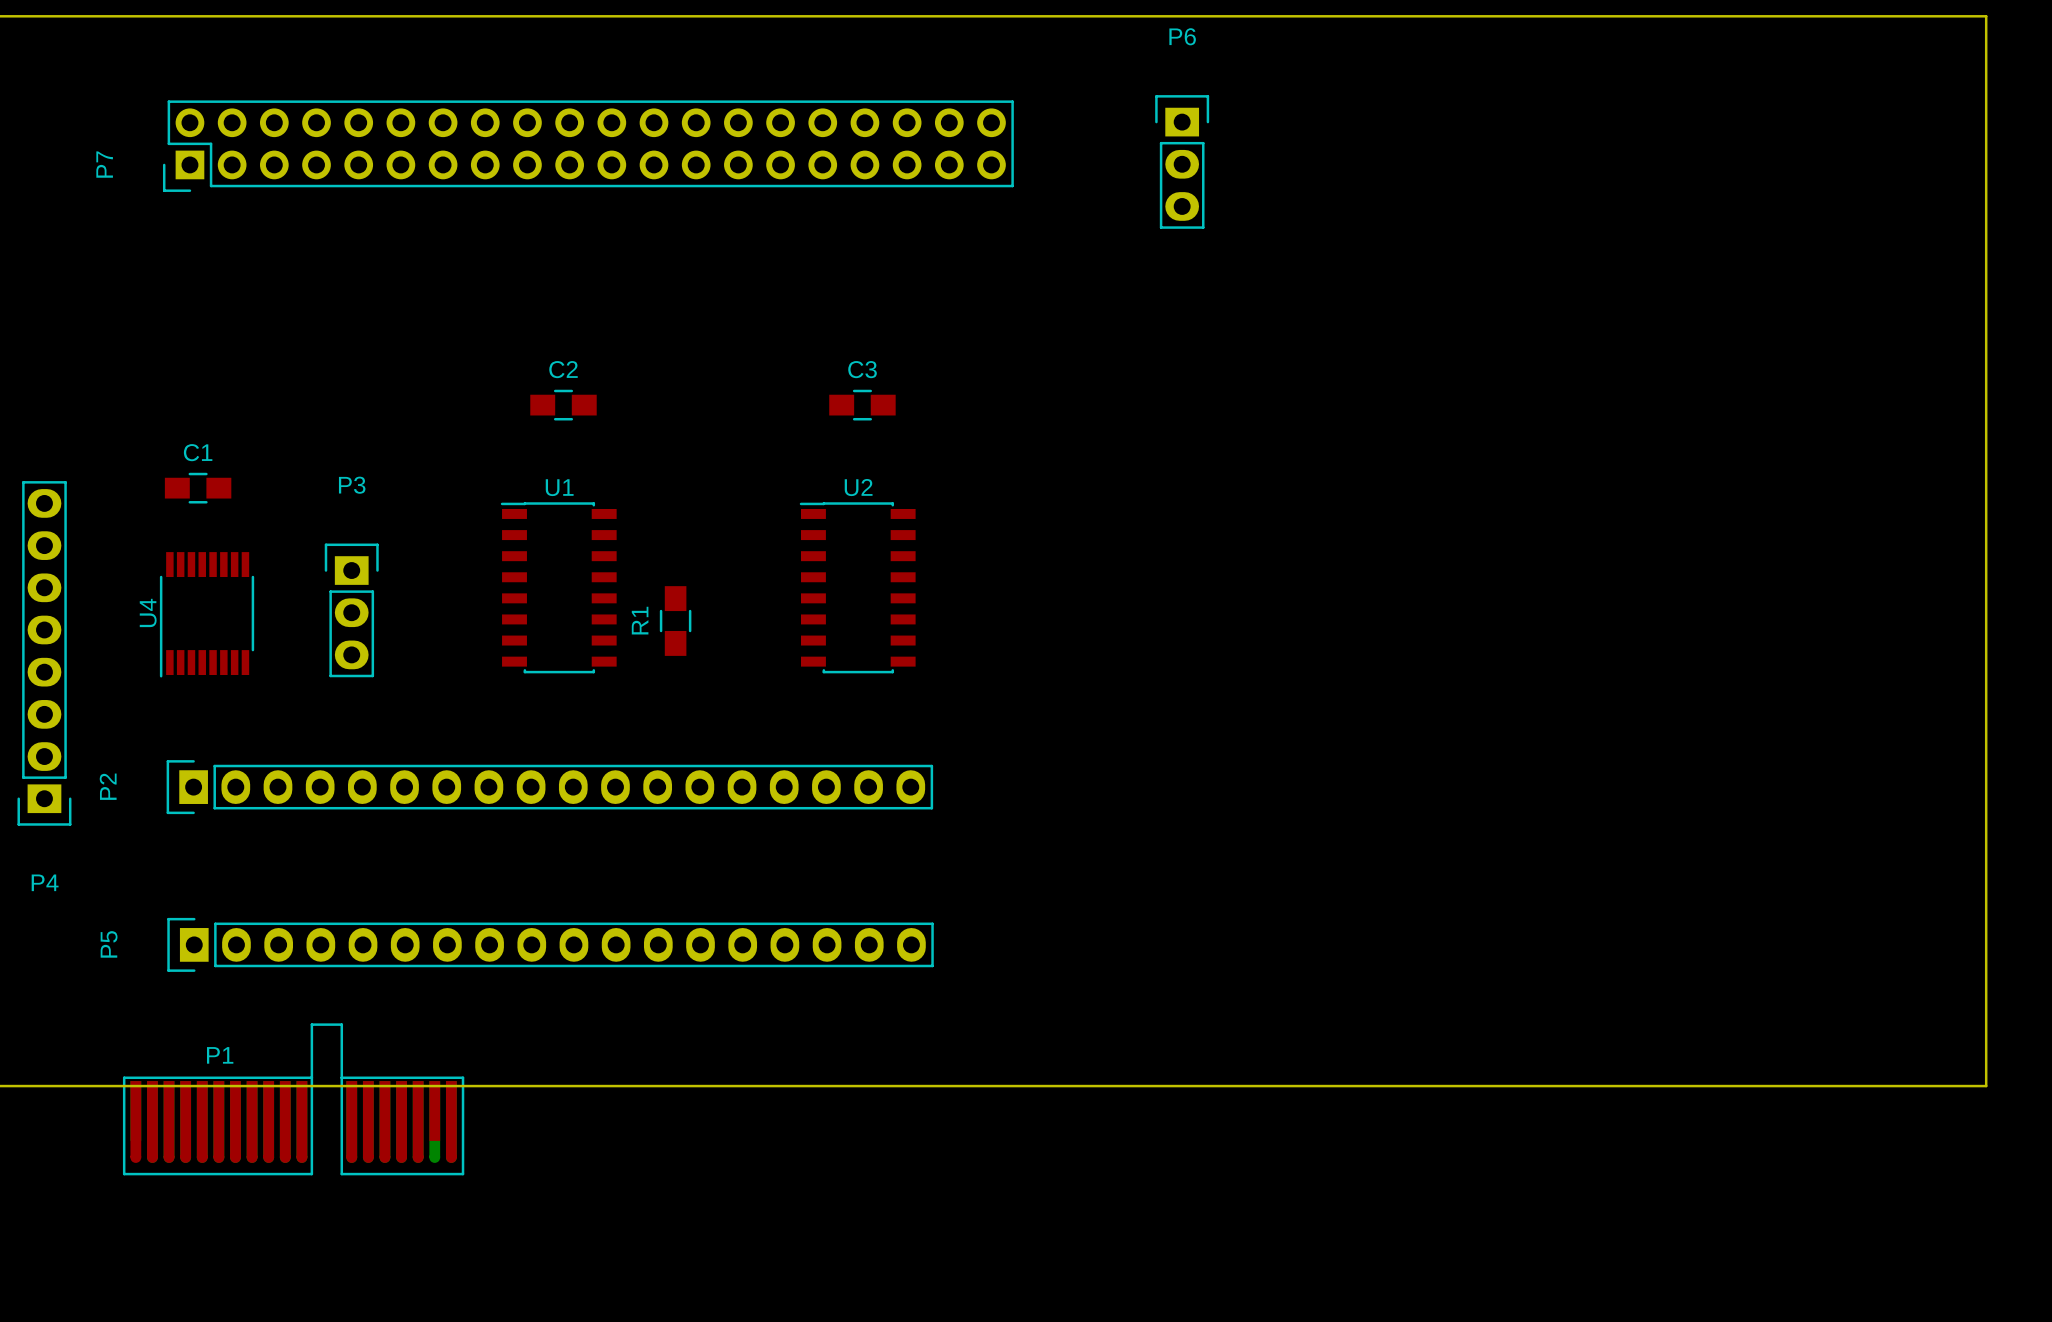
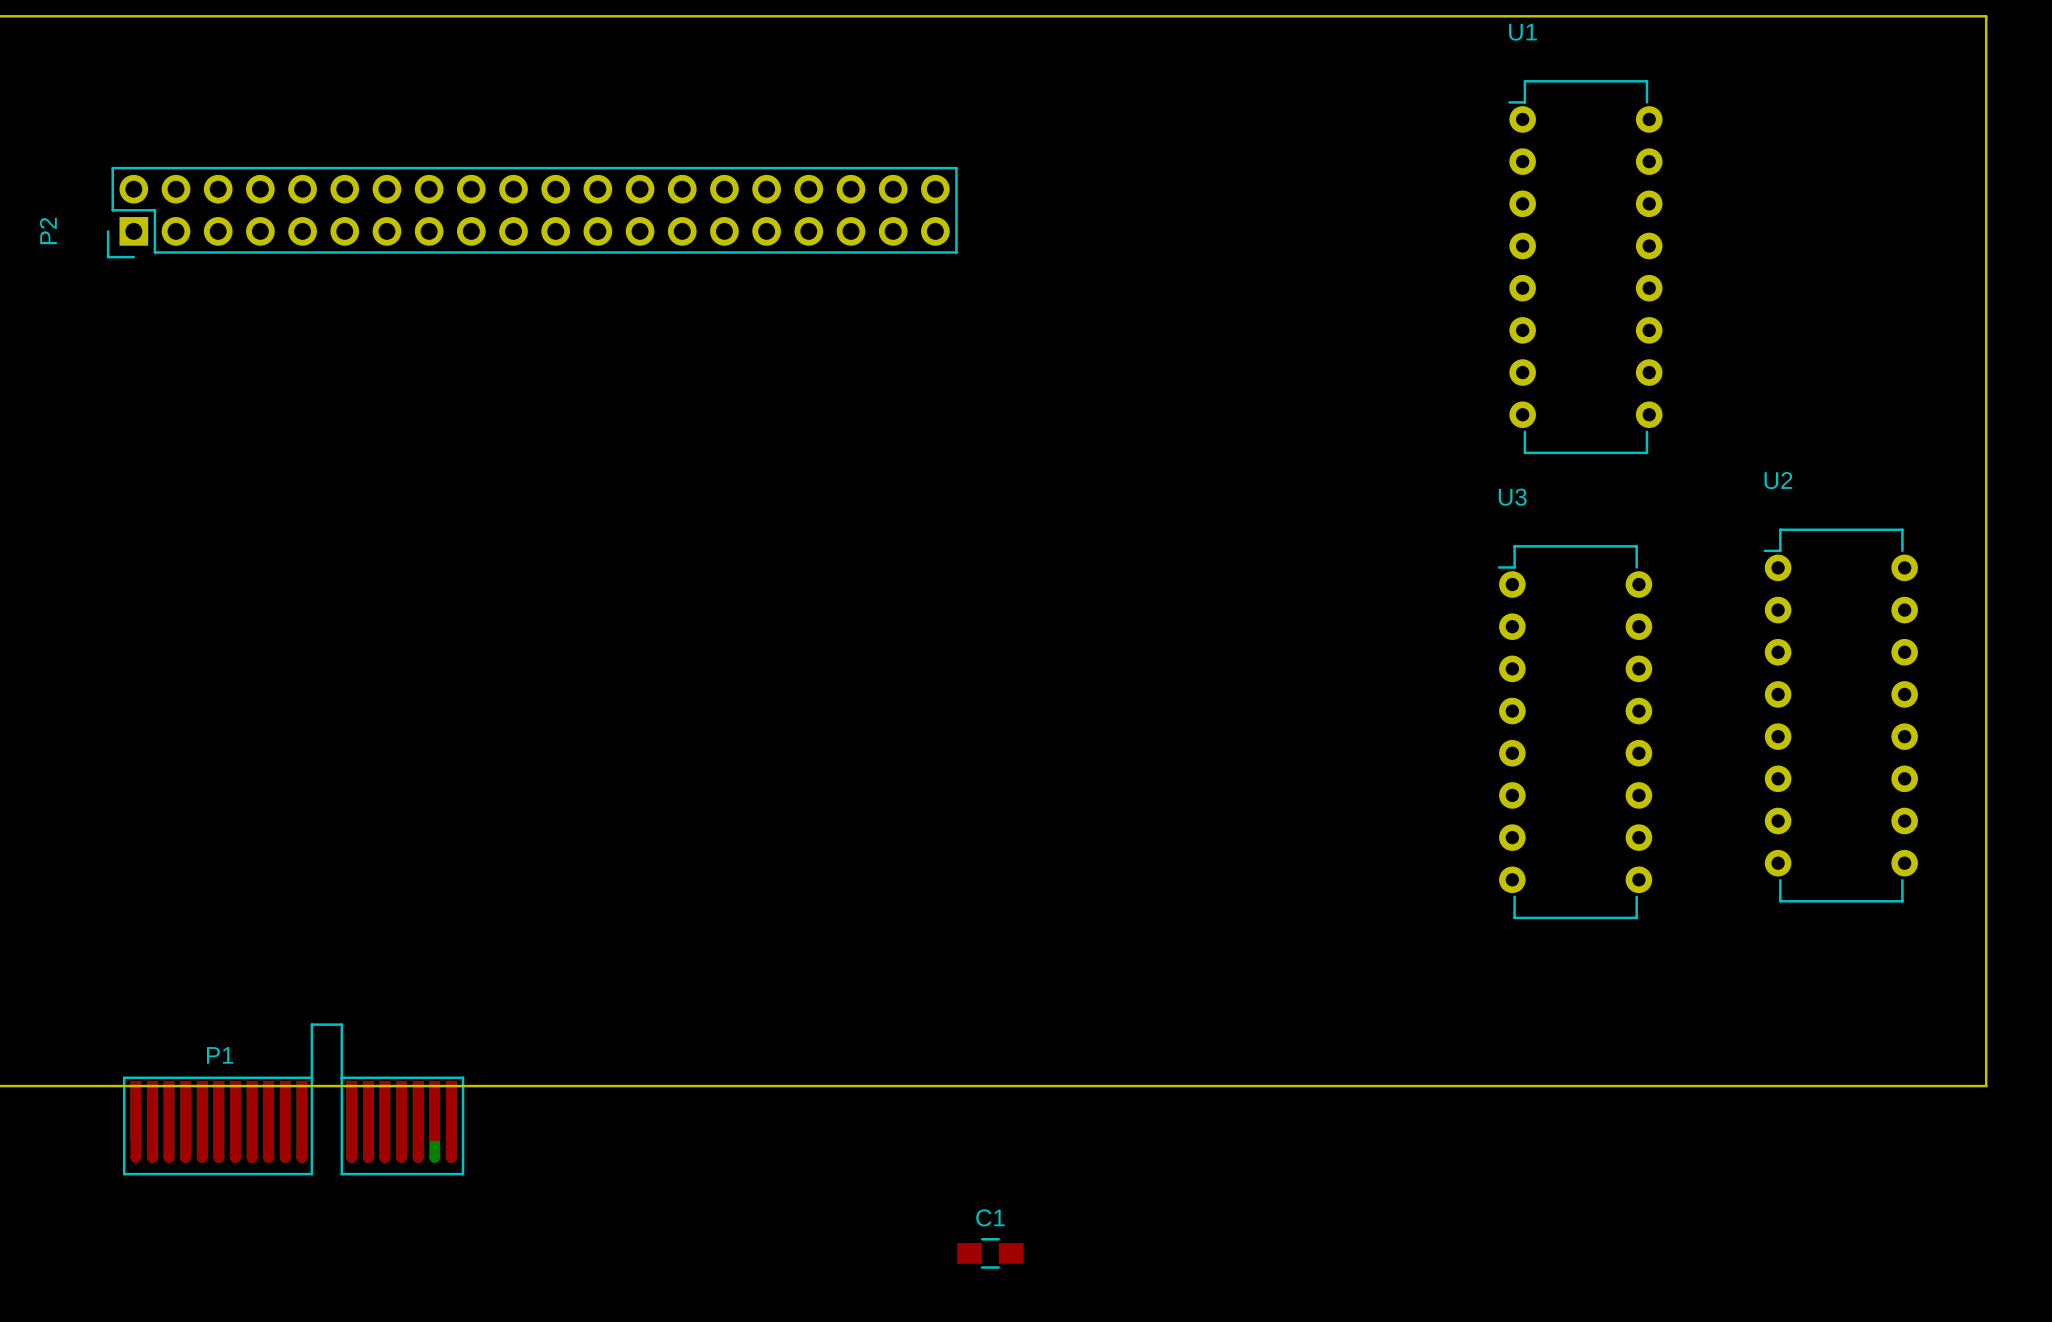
P7: (588, 146) -> none
P6: (1182, 161) -> none
C2: (563, 405) -> none
C3: (862, 405) -> none
U1 name position: U1 (559, 487) -> U1 (1522, 32)
U2 name position: U2 (858, 487) -> U2 (1778, 480)
C1 position: (198, 488) -> (990, 1253)
U1 footprint: [500, 502, 617, 674] -> [1508, 80, 1663, 455]
U2 footprint: [799, 502, 916, 674] -> [1763, 528, 1918, 903]
P3: (351, 610) -> none
U4: (207, 614) -> none
R1: (675, 621) -> none
P4: (44, 653) -> none
U3: none -> (1575, 732)
P2 footprint: [166, 760, 934, 815] -> [106, 166, 958, 259]
P2 name position: P2 (108, 786) -> P2 (48, 231)
P5: (550, 944) -> none

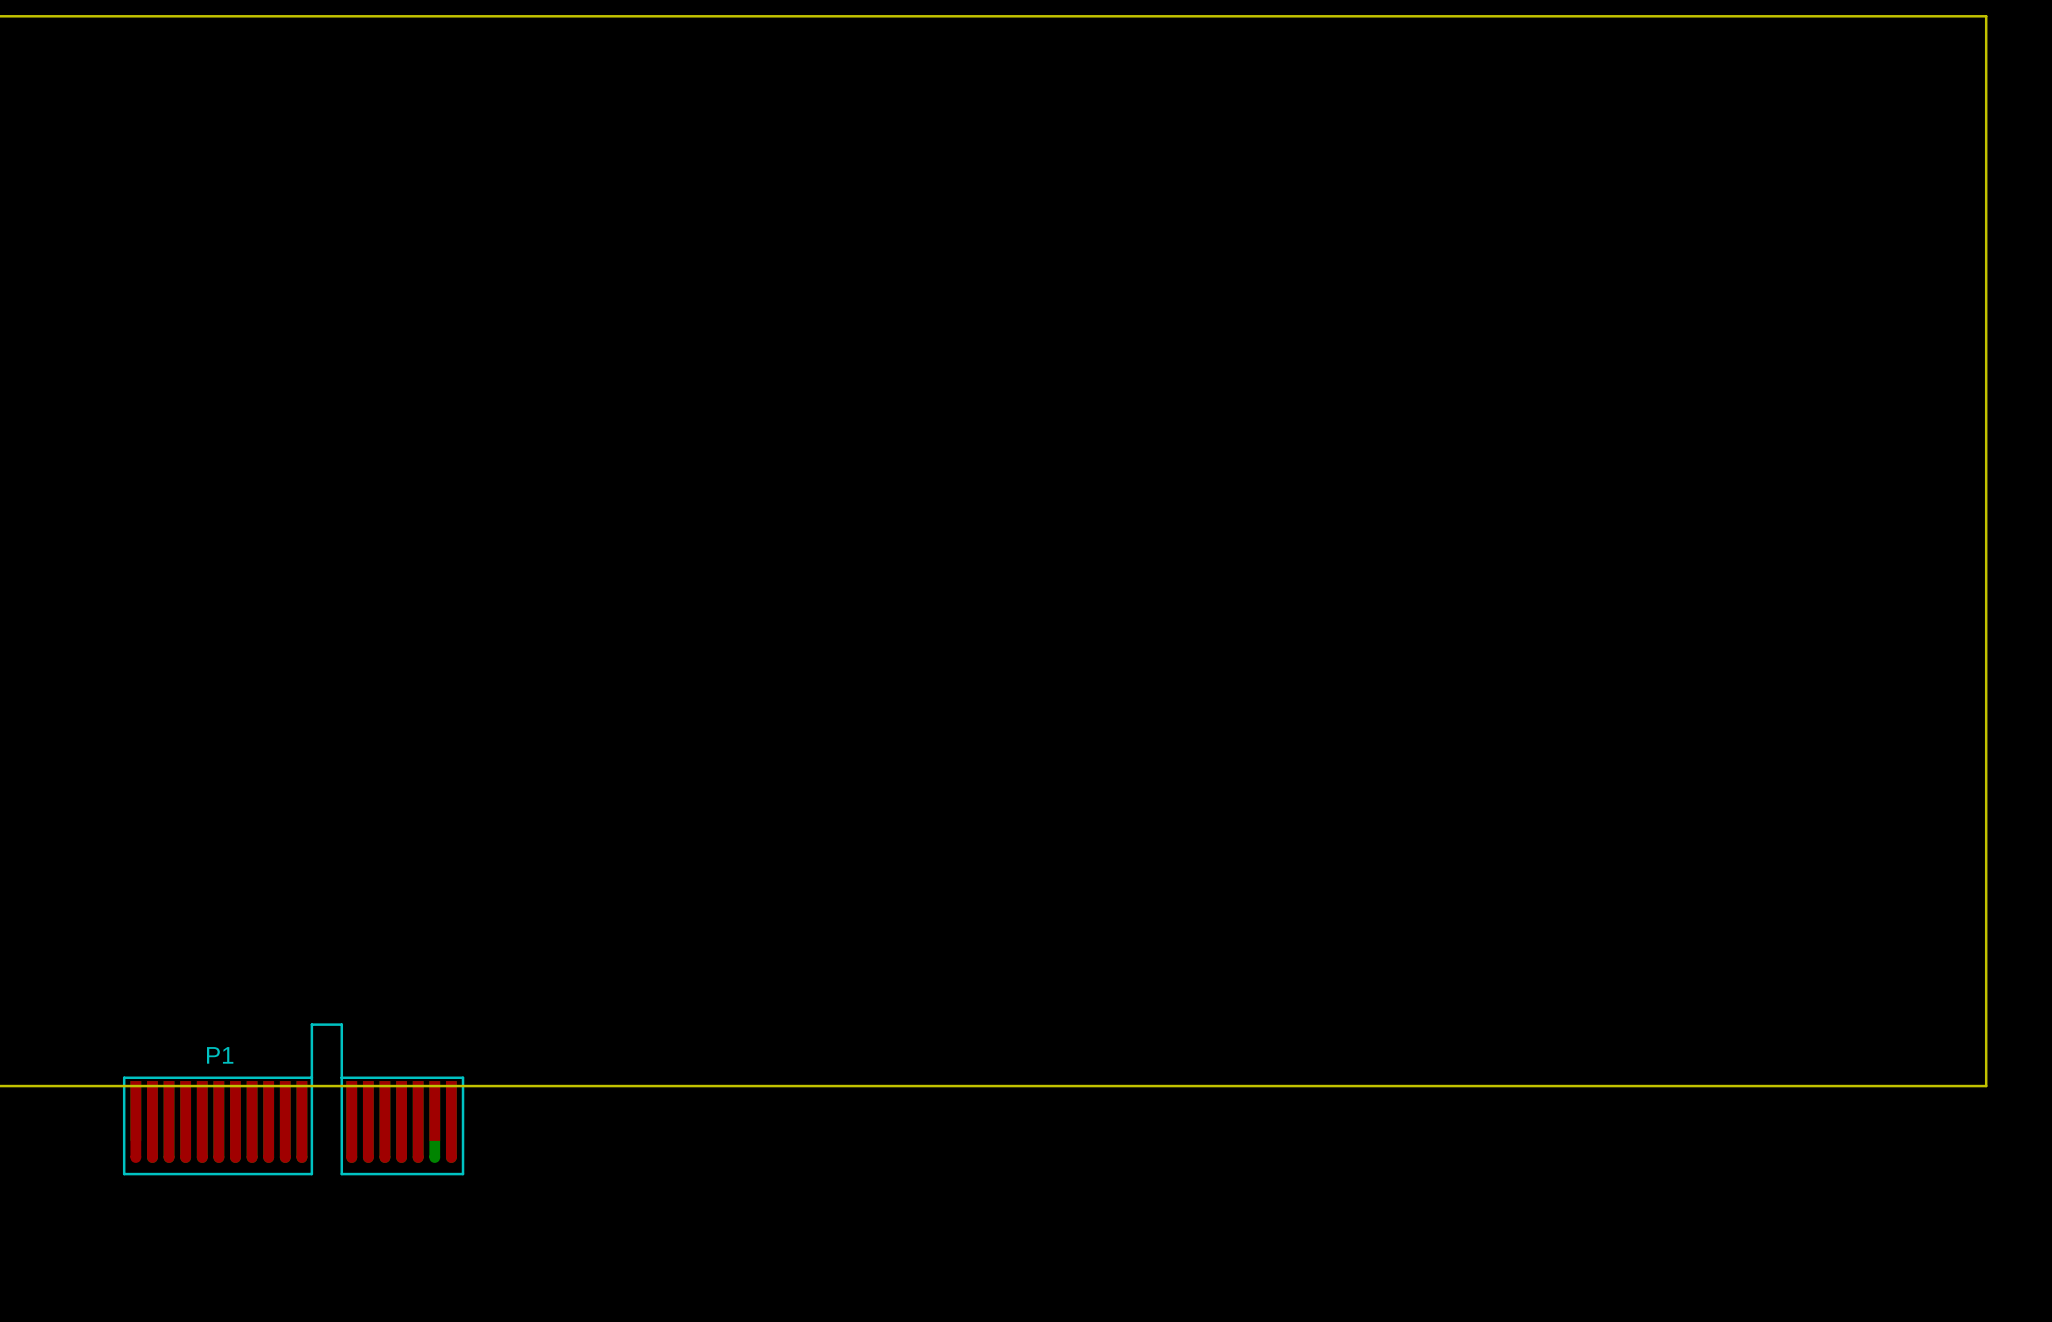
P2: (532, 212) -> none
U1: (1585, 267) -> none
U2: (1840, 715) -> none
U3: (1575, 732) -> none
C1: (990, 1253) -> none

